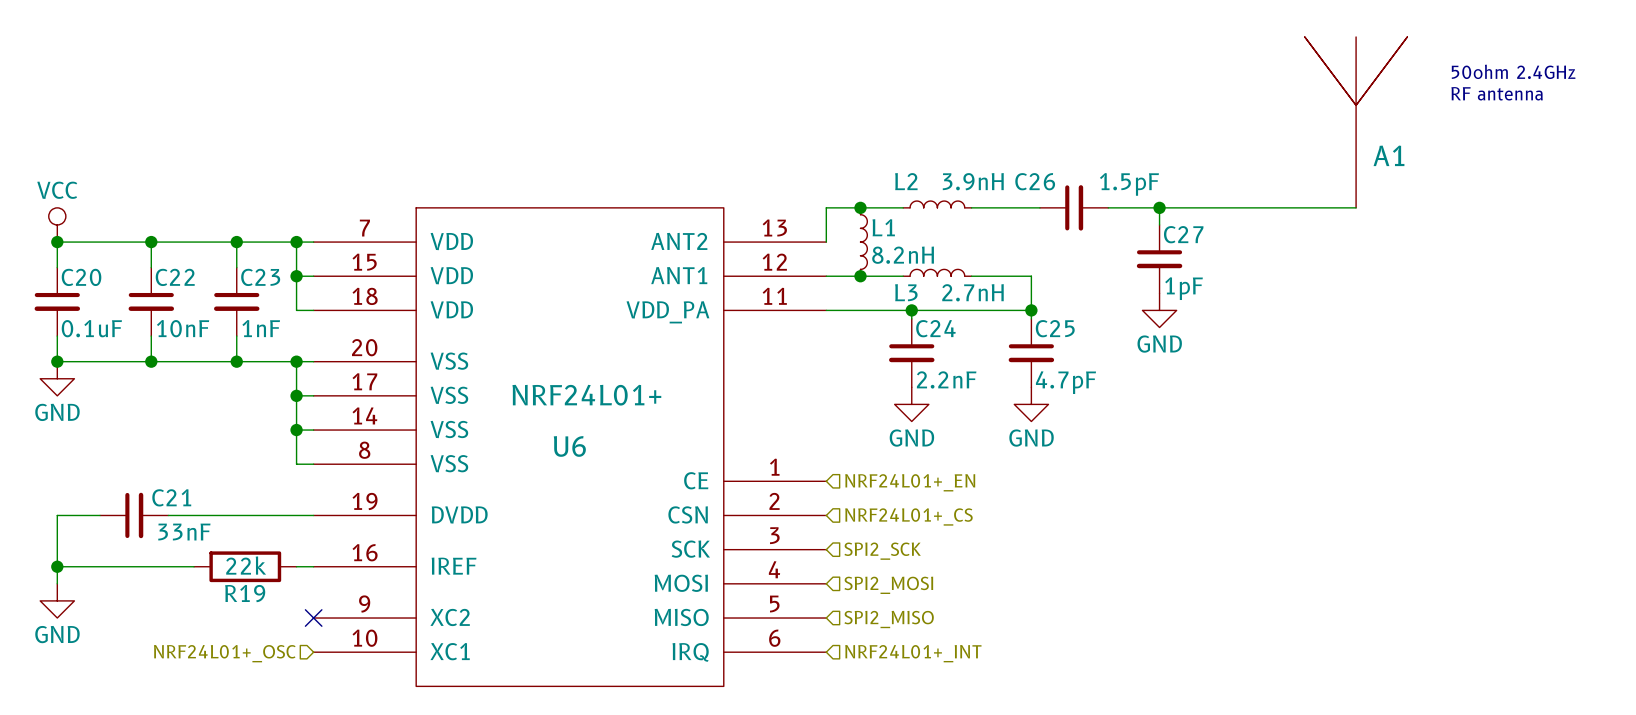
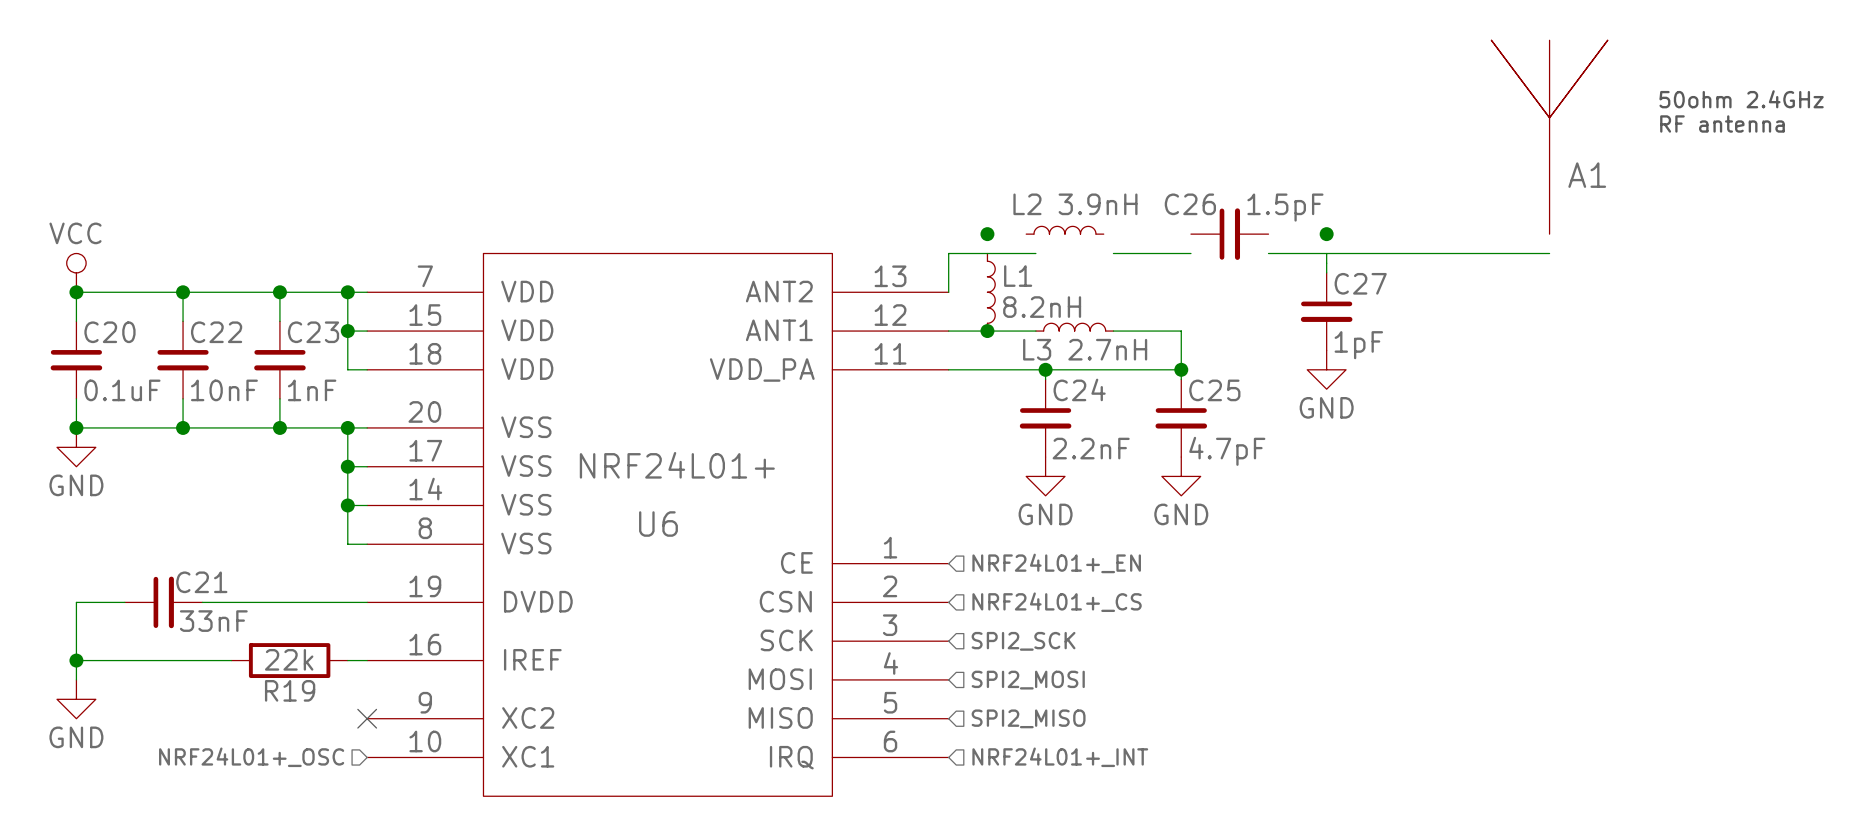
A1 position: (1356, 122) -> (1549, 137)
C26 name position: C26 (1035, 181) -> C26 (1190, 204)
L2 position: (937, 204) -> (1064, 230)
junction position: (860, 207) -> (987, 234)
C26 position: (1074, 207) -> (1229, 234)
junction position: (1159, 207) -> (1326, 234)

